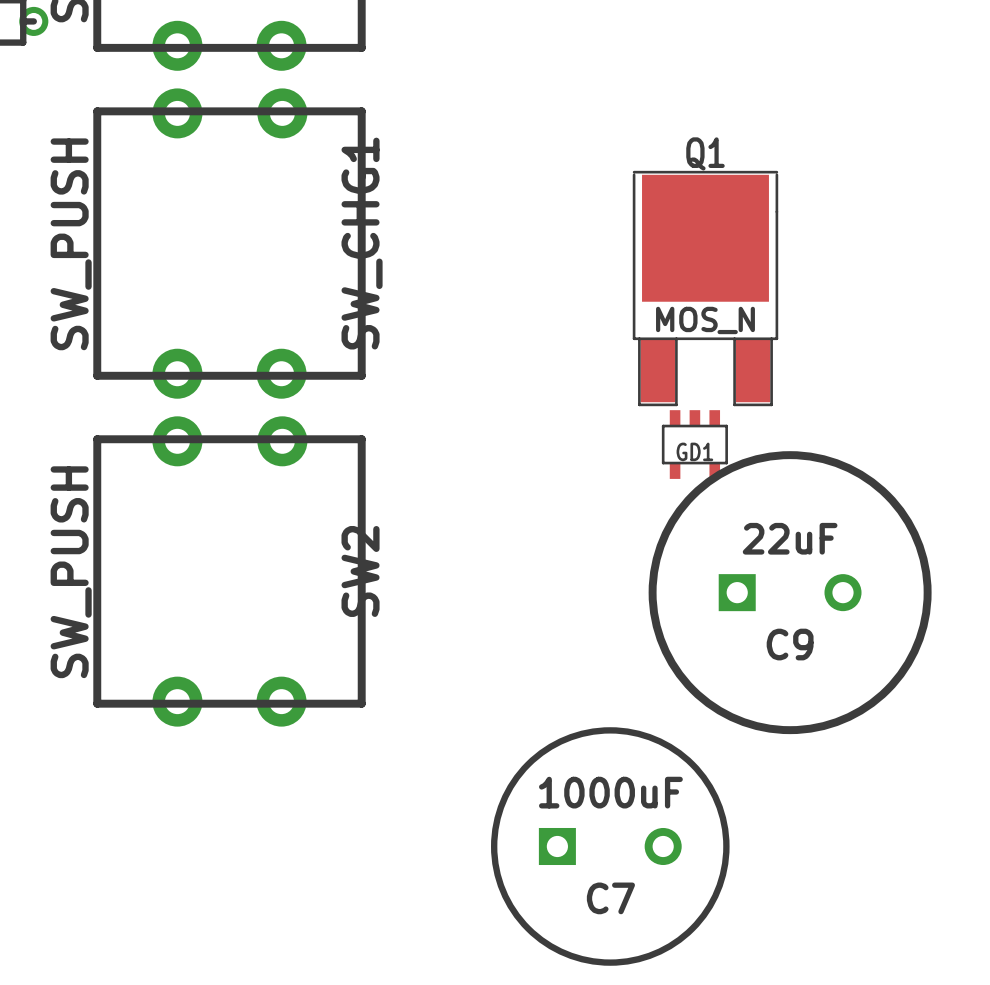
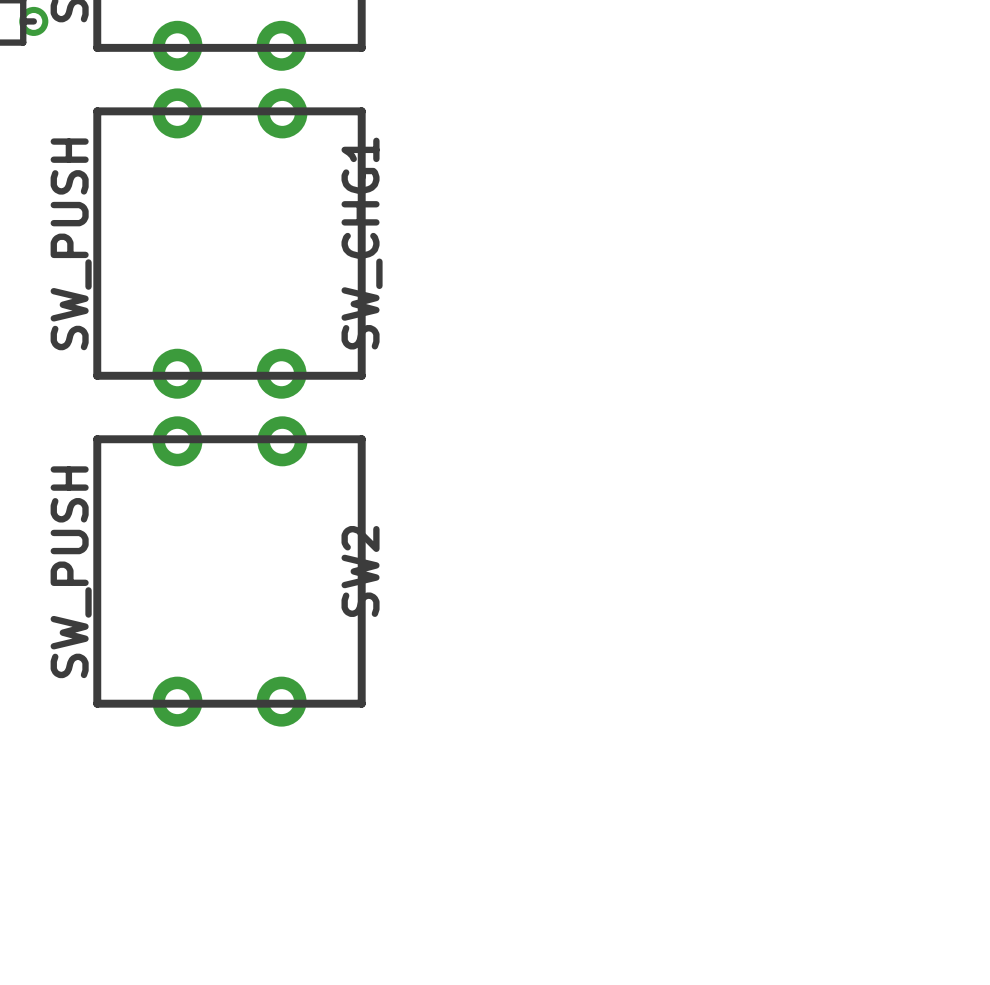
Q1: MOS_N (705, 288) -> none
GD1: (694, 444) -> none
C9: 22uF (790, 592) -> none
C7: 1000uF (610, 846) -> none

